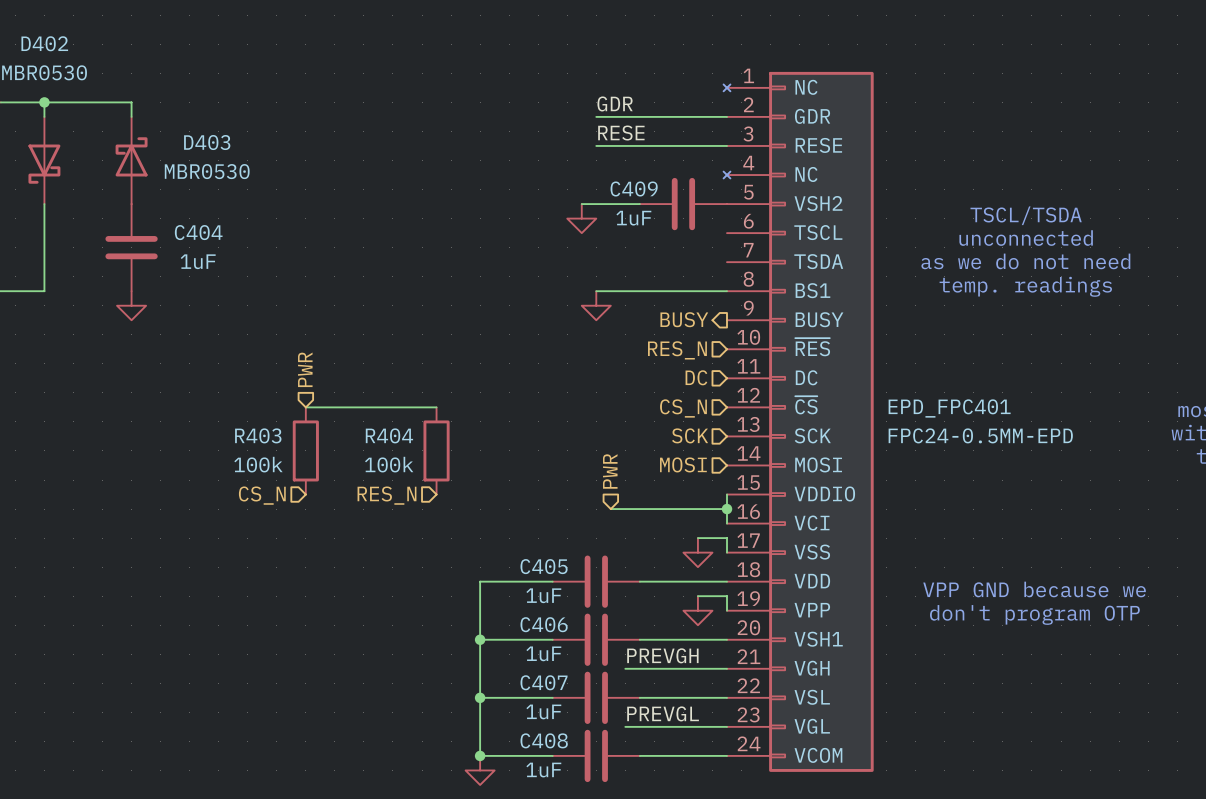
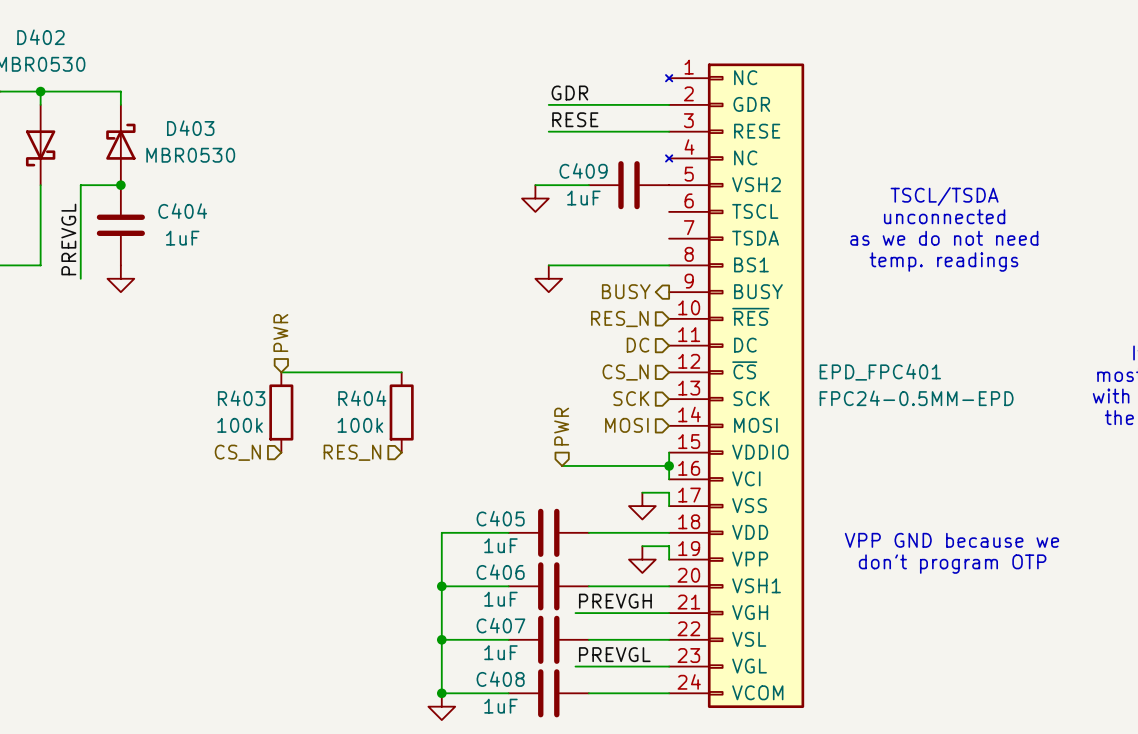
wire: none -> (120, 185) (80, 185) (80, 278)
junction: none -> (120, 185)
label: none -> PREVGL (68, 239)

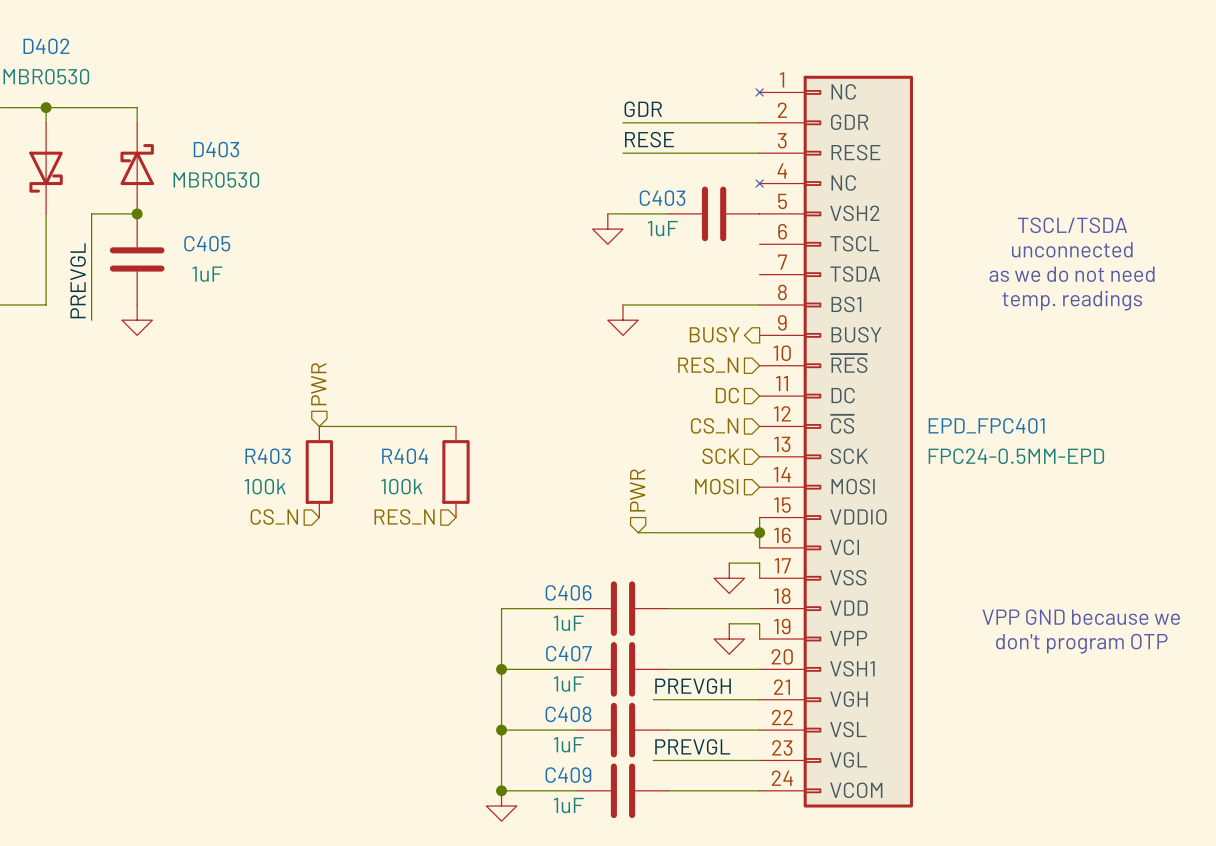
C409 name: C409 (583, 170) -> C403 (662, 198)
C404 name: C404 (182, 211) -> C405 (207, 243)
C405 name: C405 (500, 518) -> C406 (568, 592)
C406 name: C406 (500, 572) -> C407 (568, 653)
C407 name: C407 (500, 625) -> C408 (568, 714)
C408 name: C408 (500, 679) -> C409 (568, 775)

